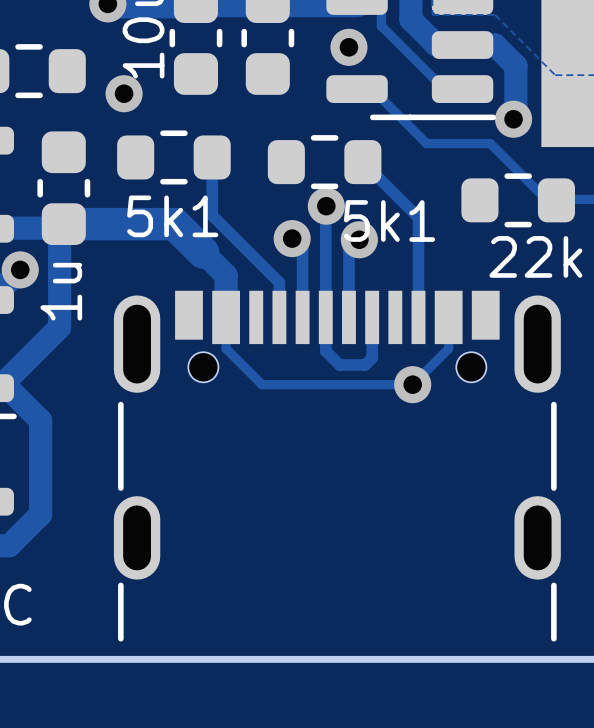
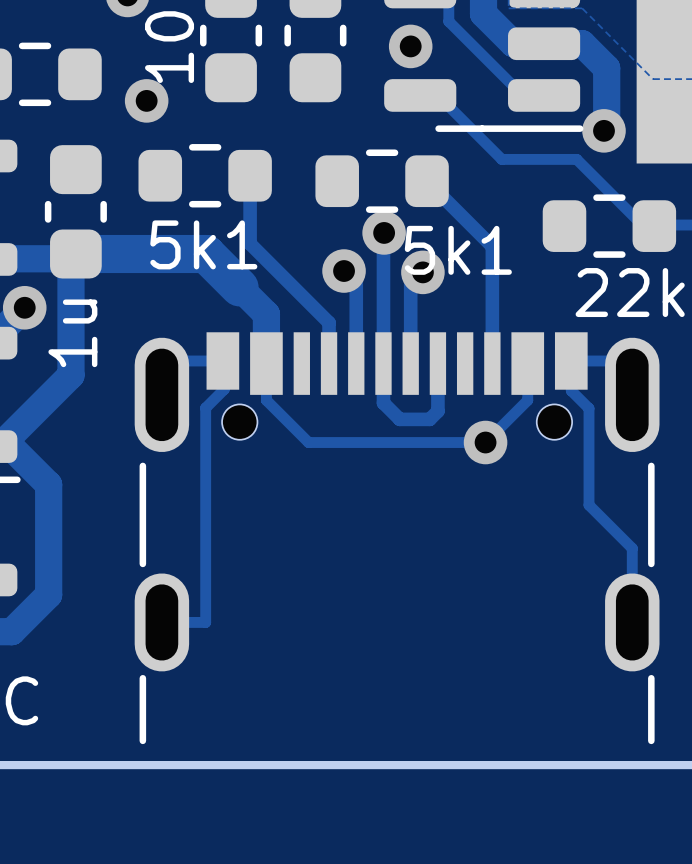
track: none -> (621, 360) (571, 360) (571, 390) (589, 408) (589, 505) (632, 548) (632, 622)
track: none -> (161, 394) (161, 382) (183, 360) (224, 362) (224, 389) (205, 407) (205, 622) (161, 622)

